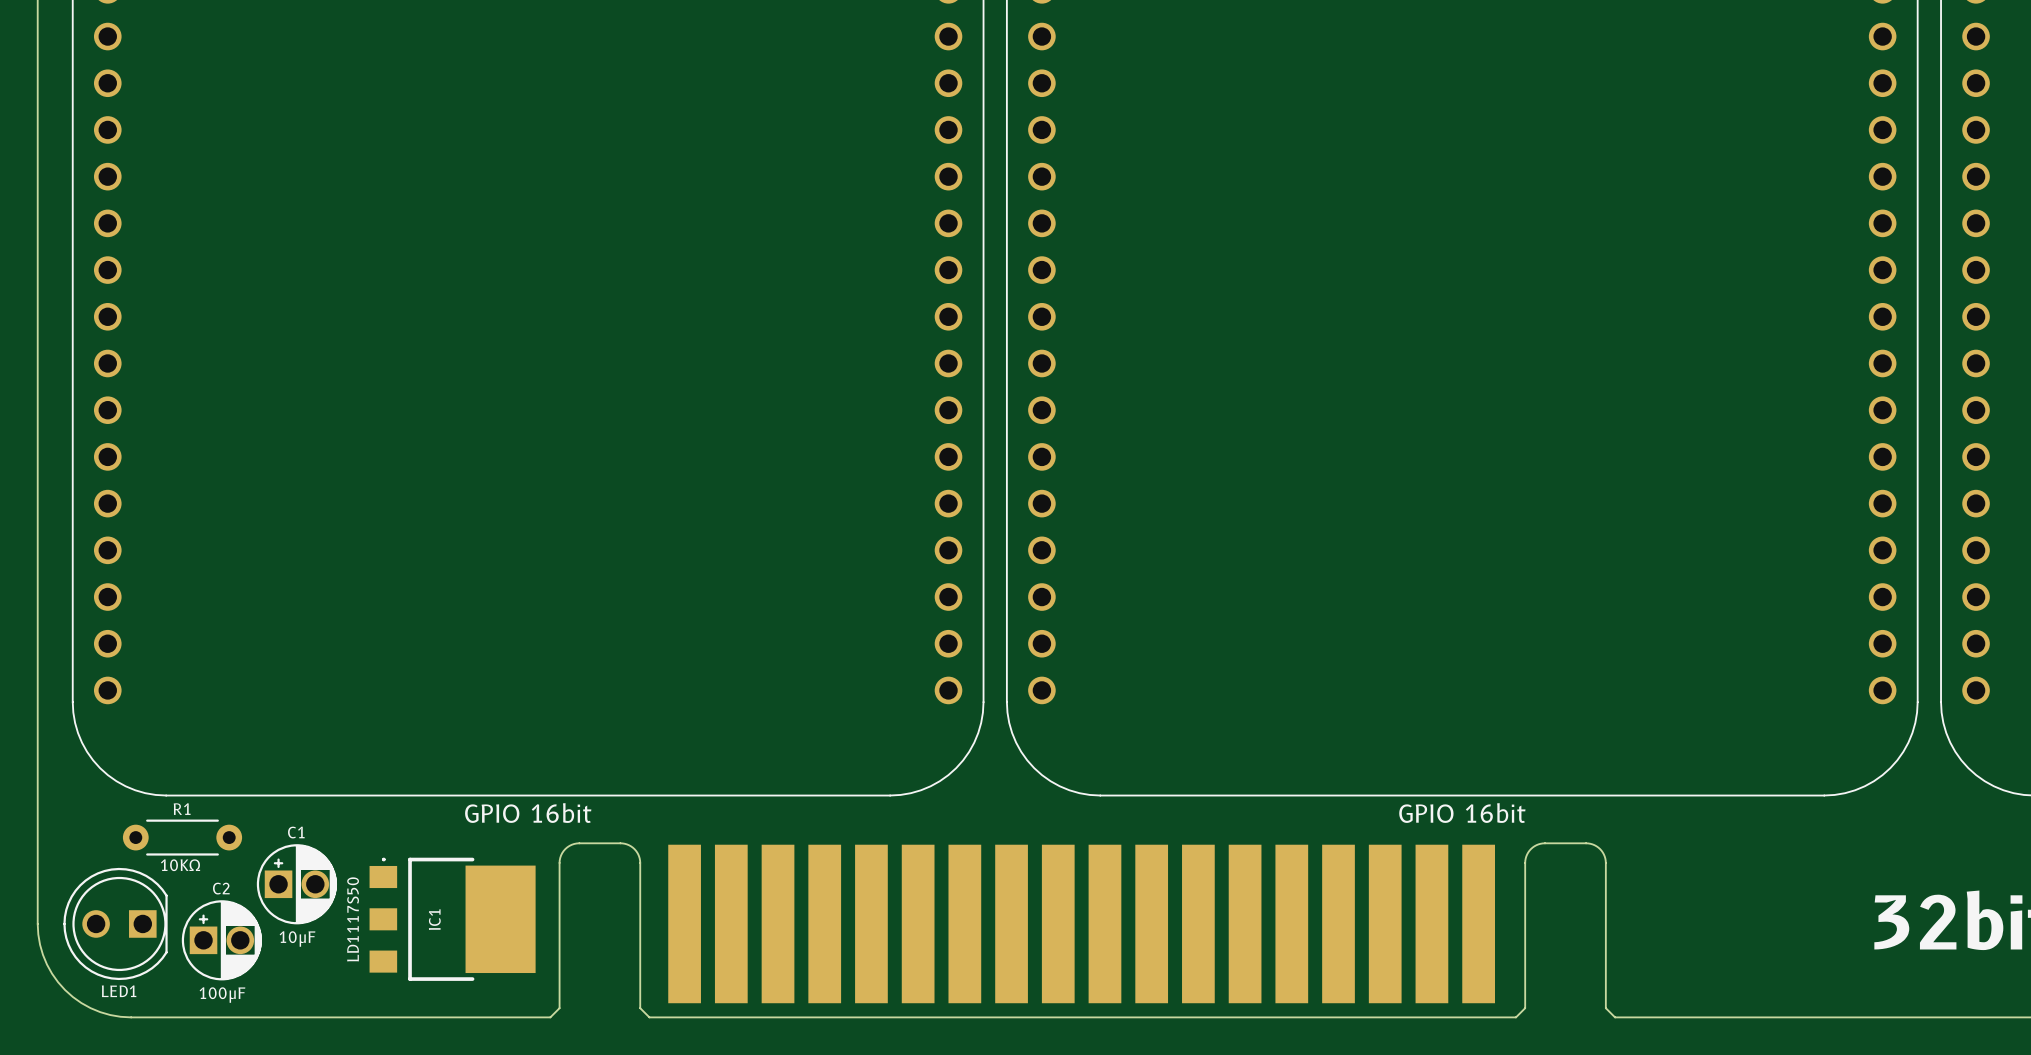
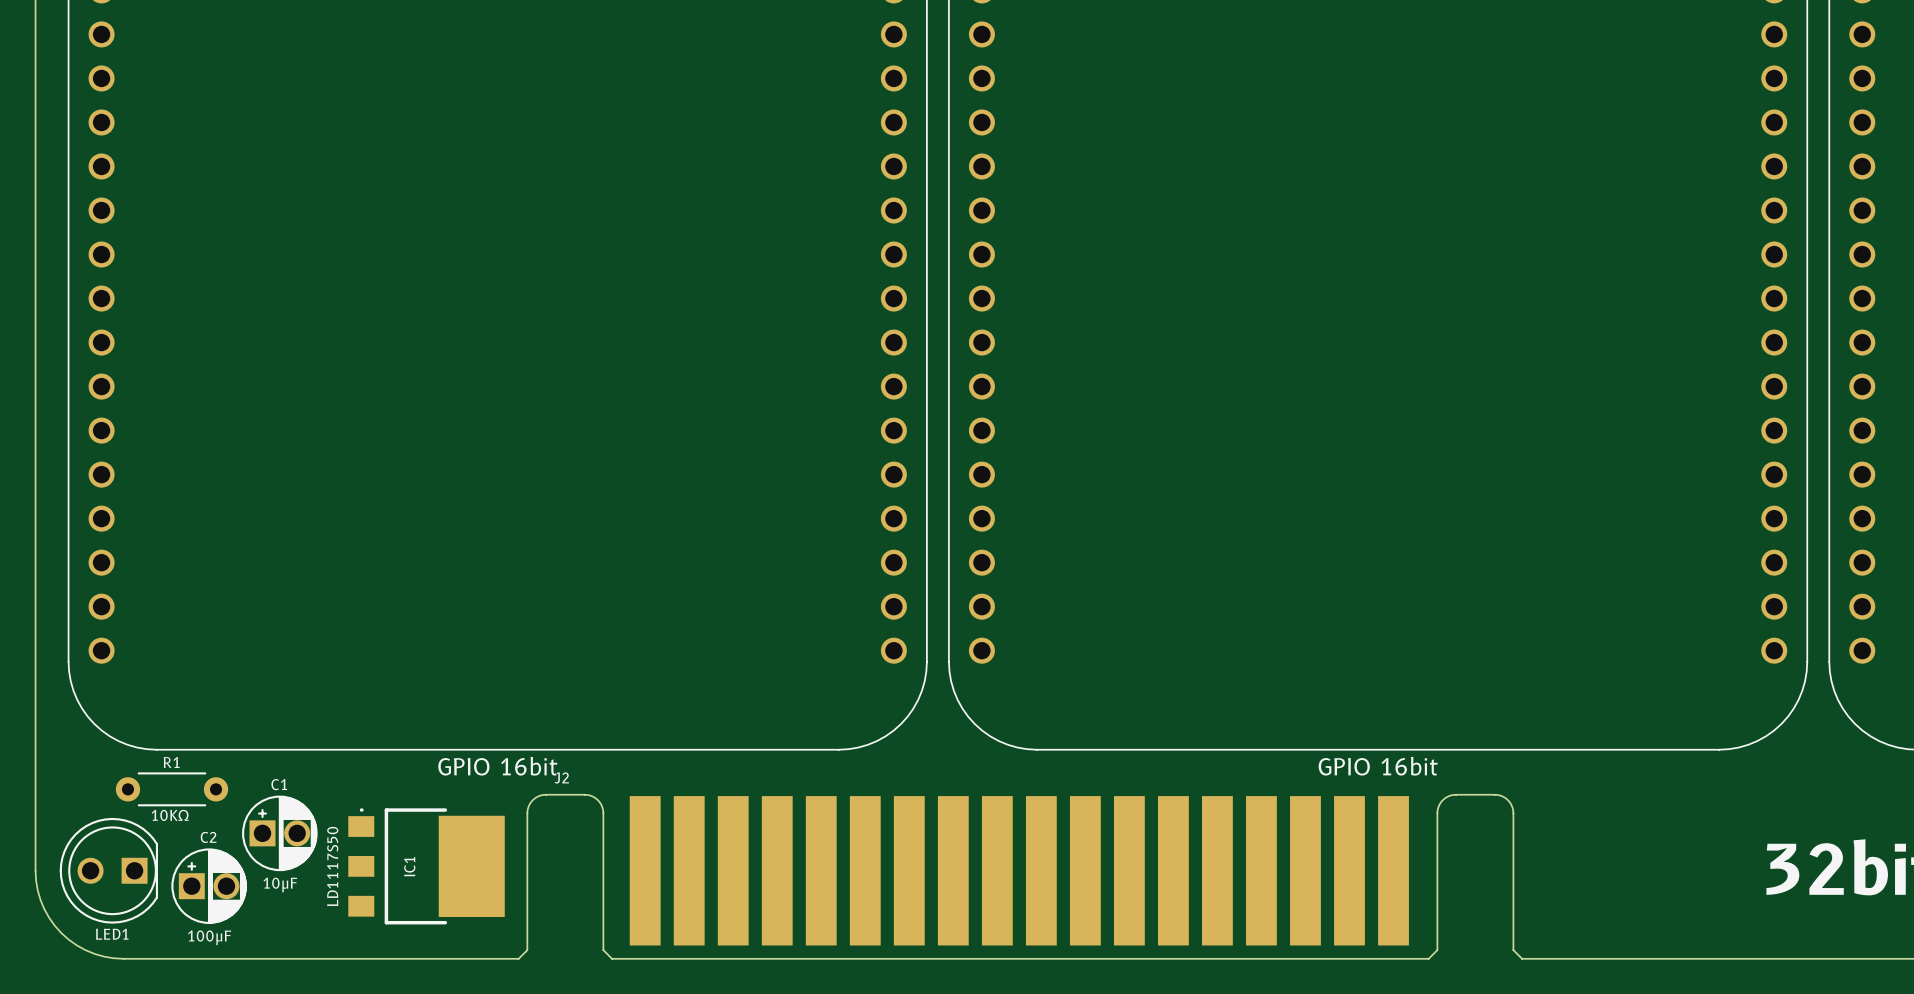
J2 name: none -> J2 (561, 777)

